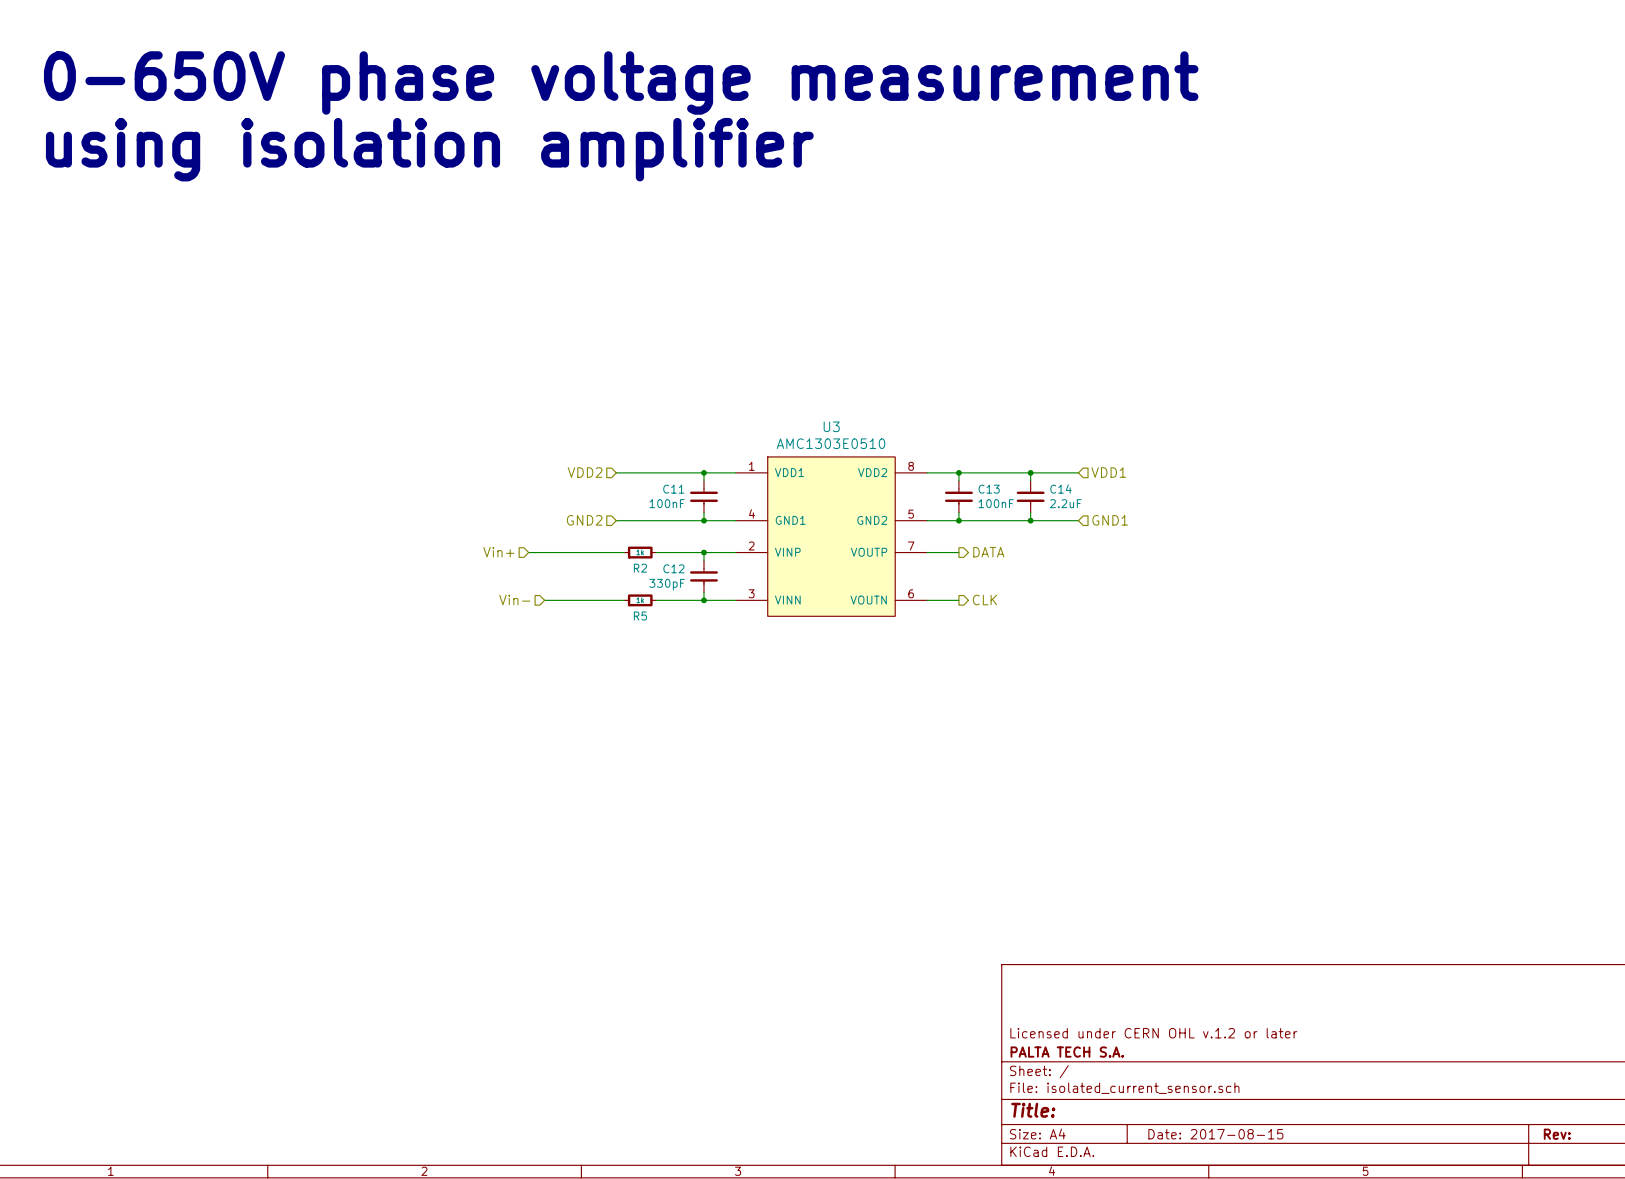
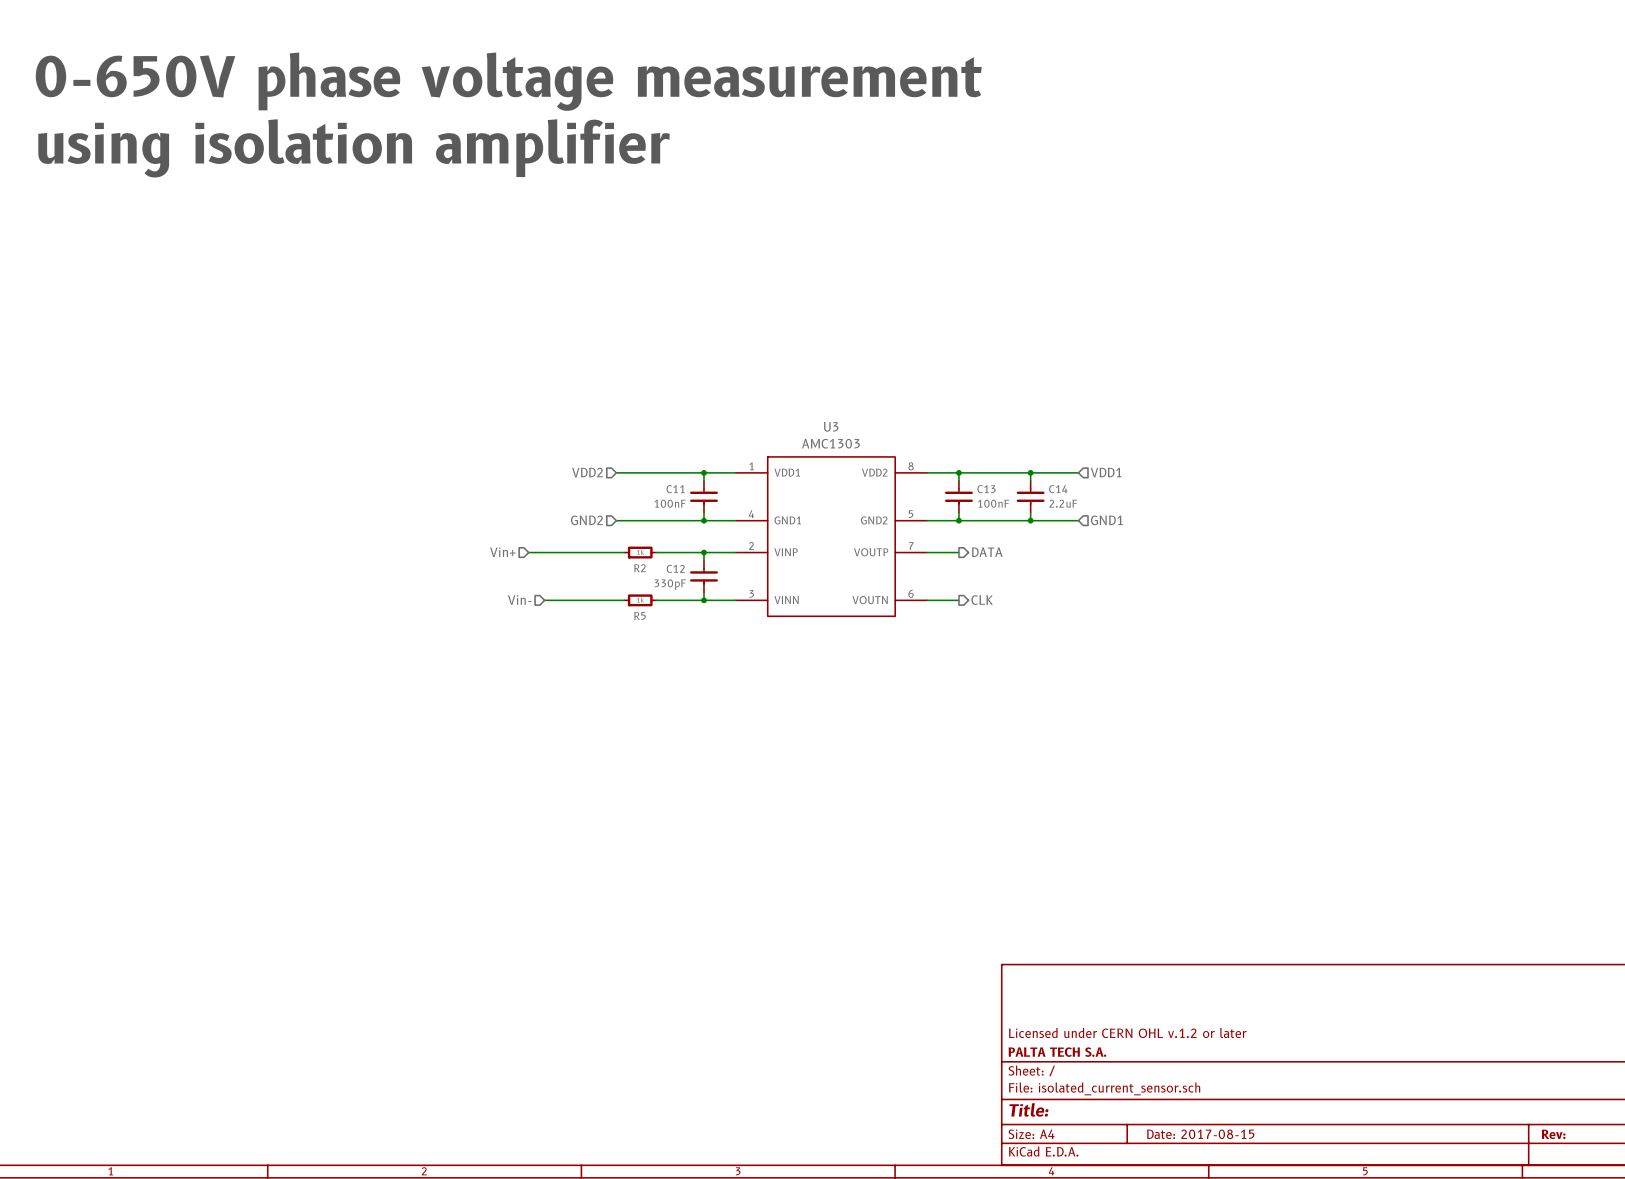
U3 value: AMC1303E0510 (831, 443) -> AMC1303 (830, 443)

